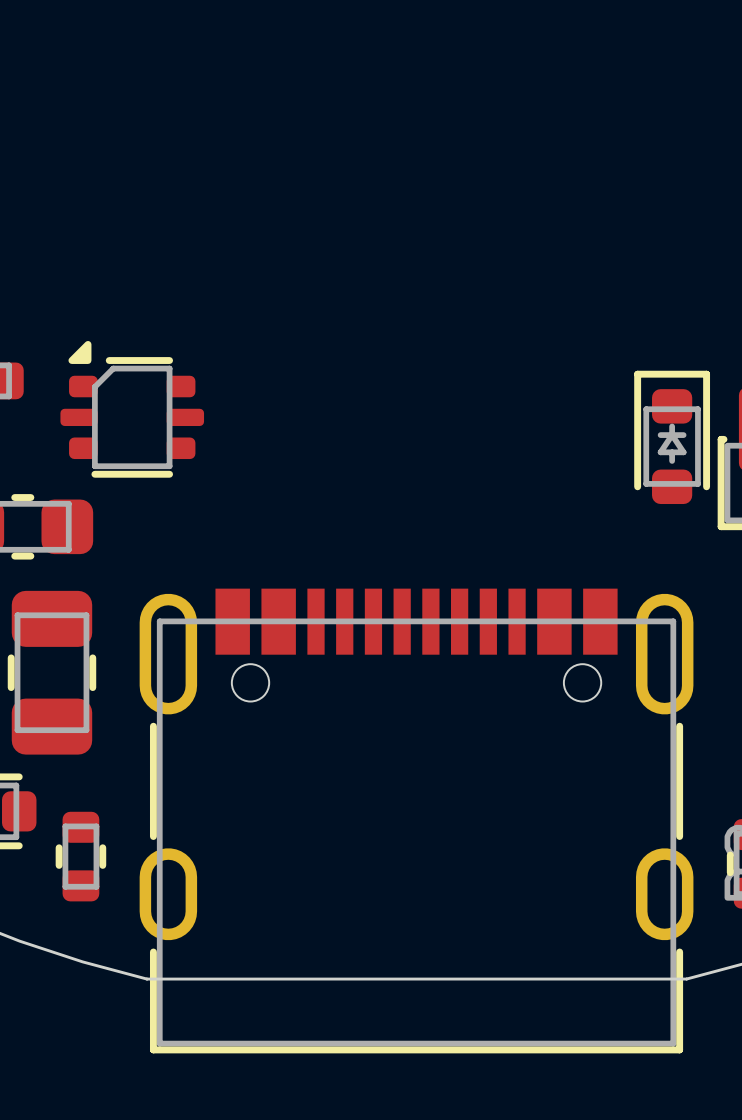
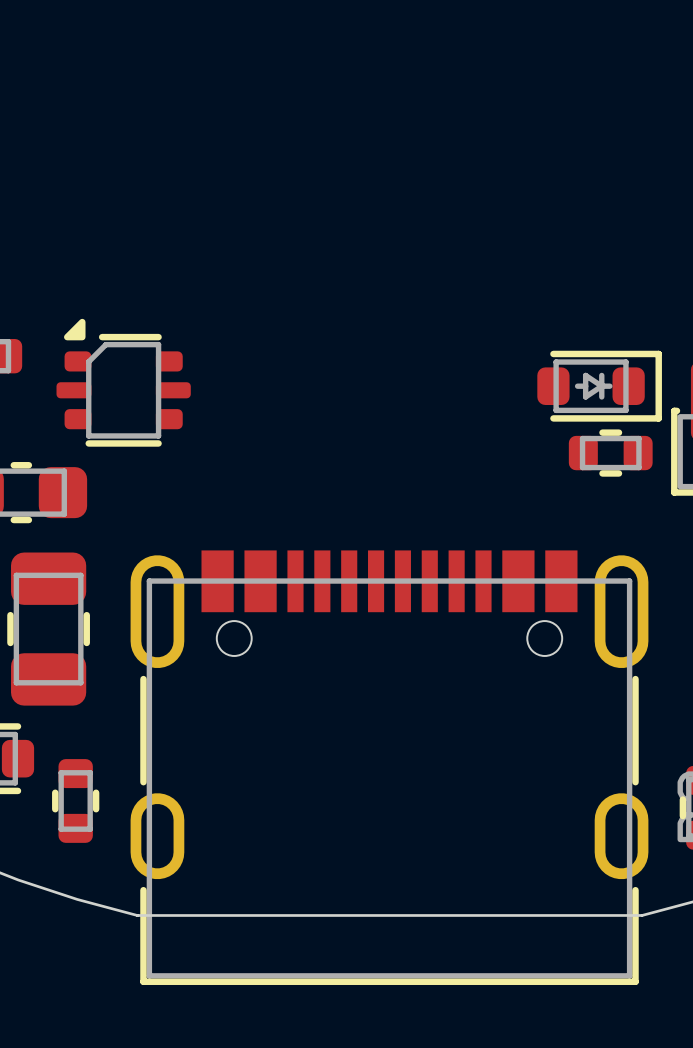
part rotation: 0° (672, 437) -> 90° clockwise (599, 386)
part: none -> (610, 453)

